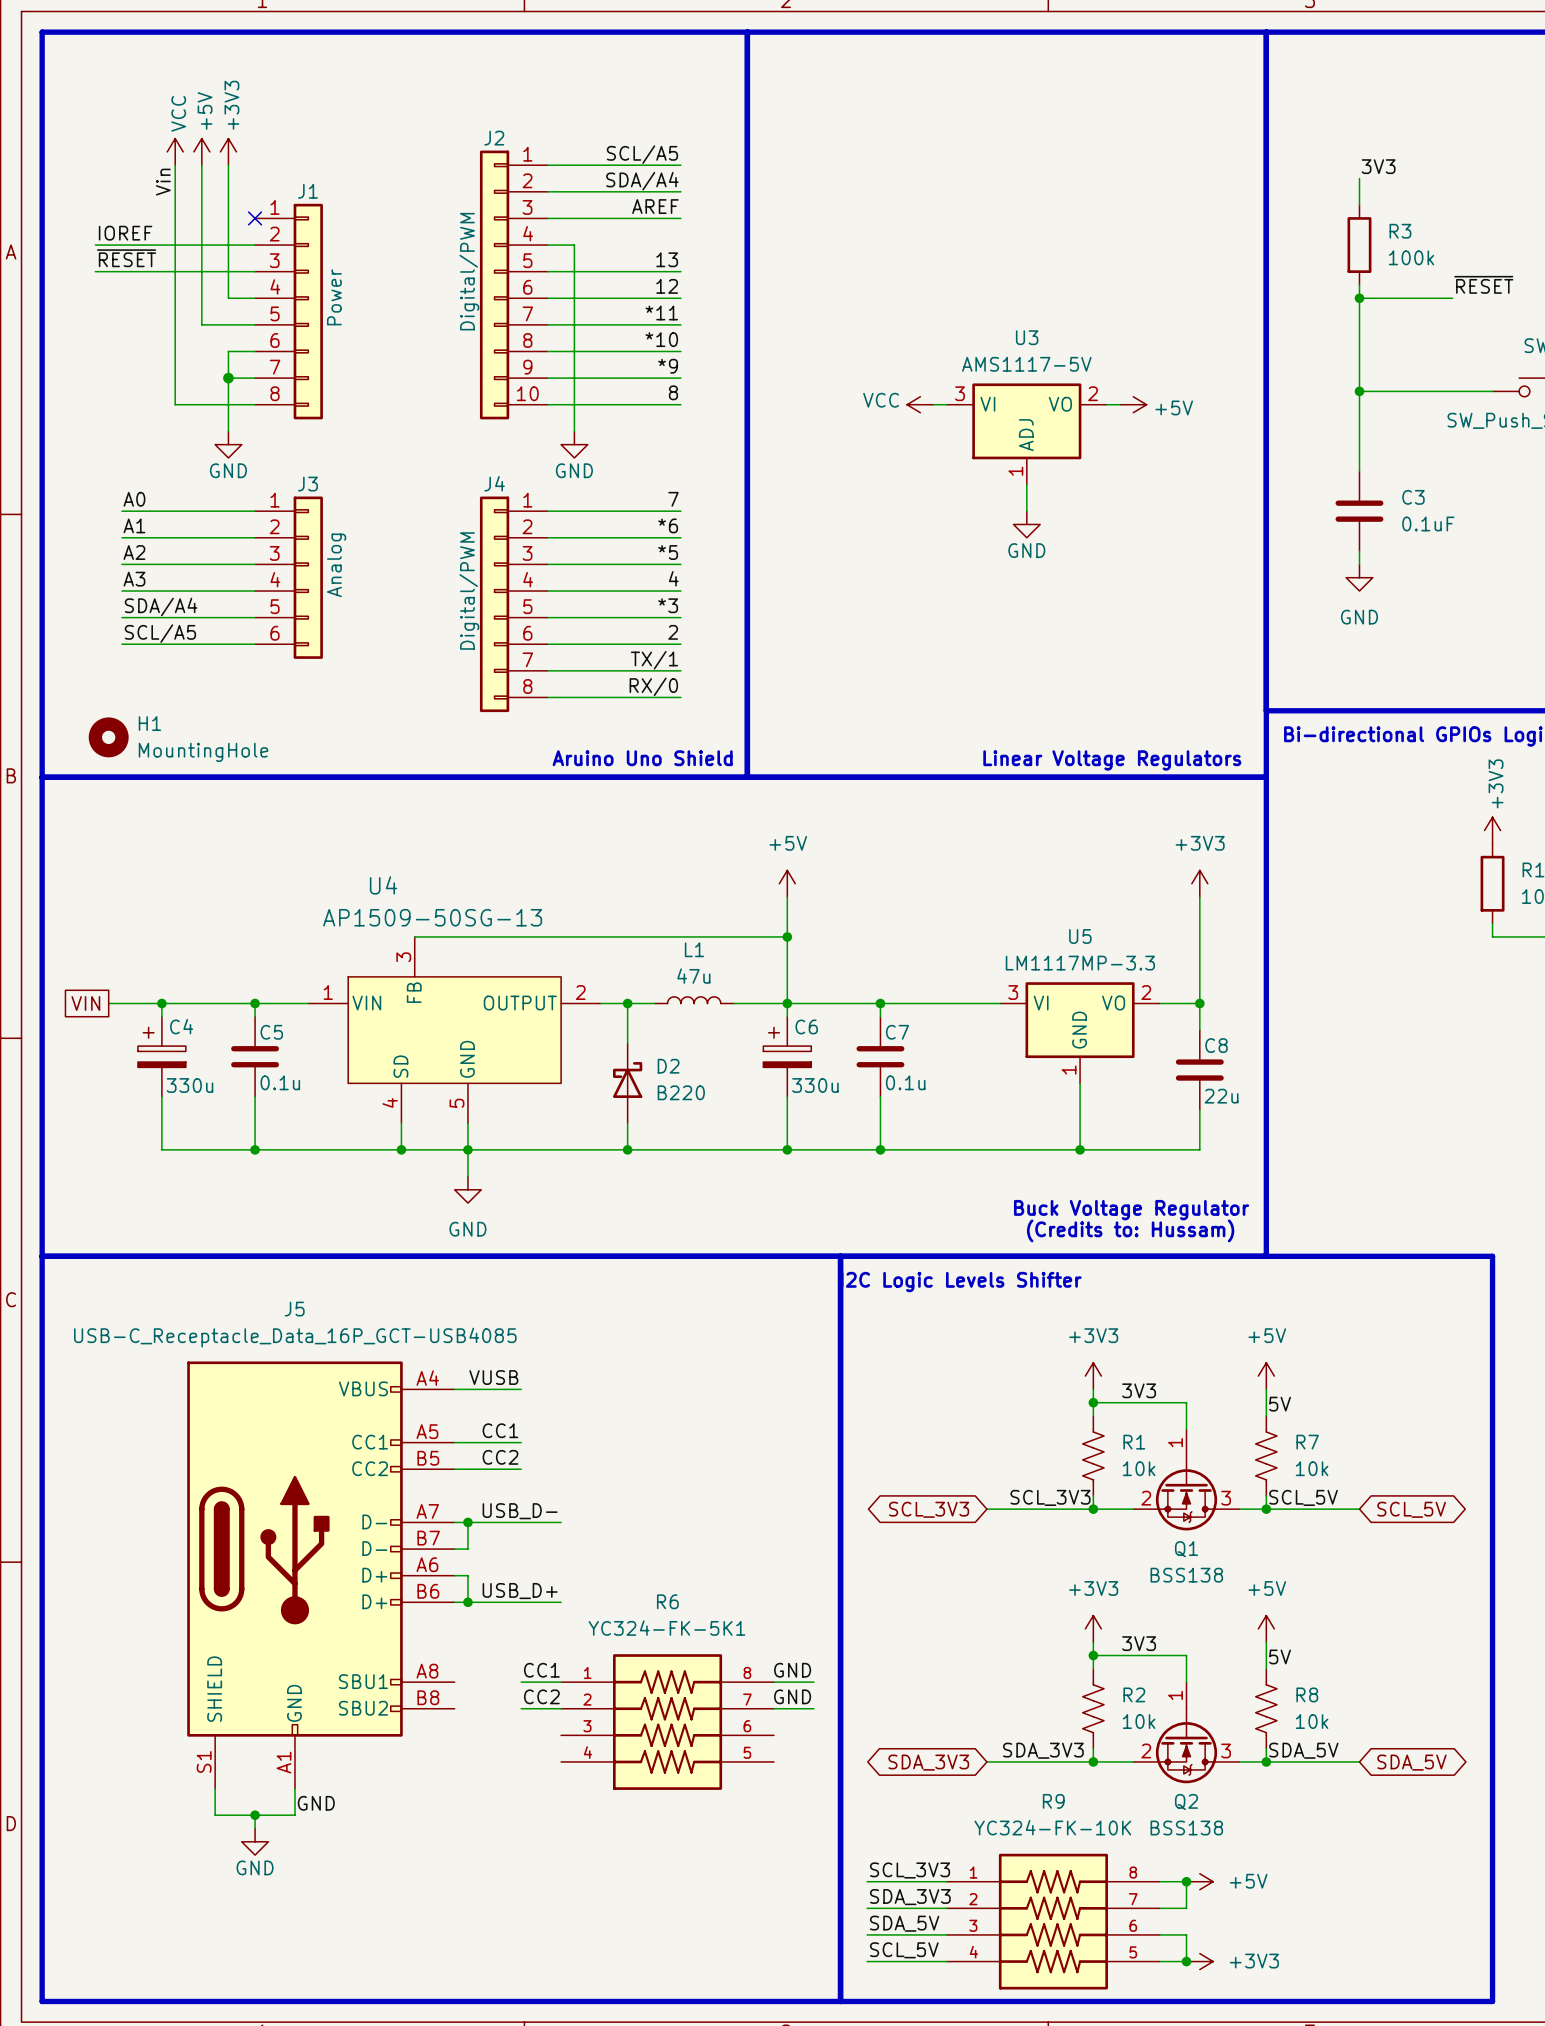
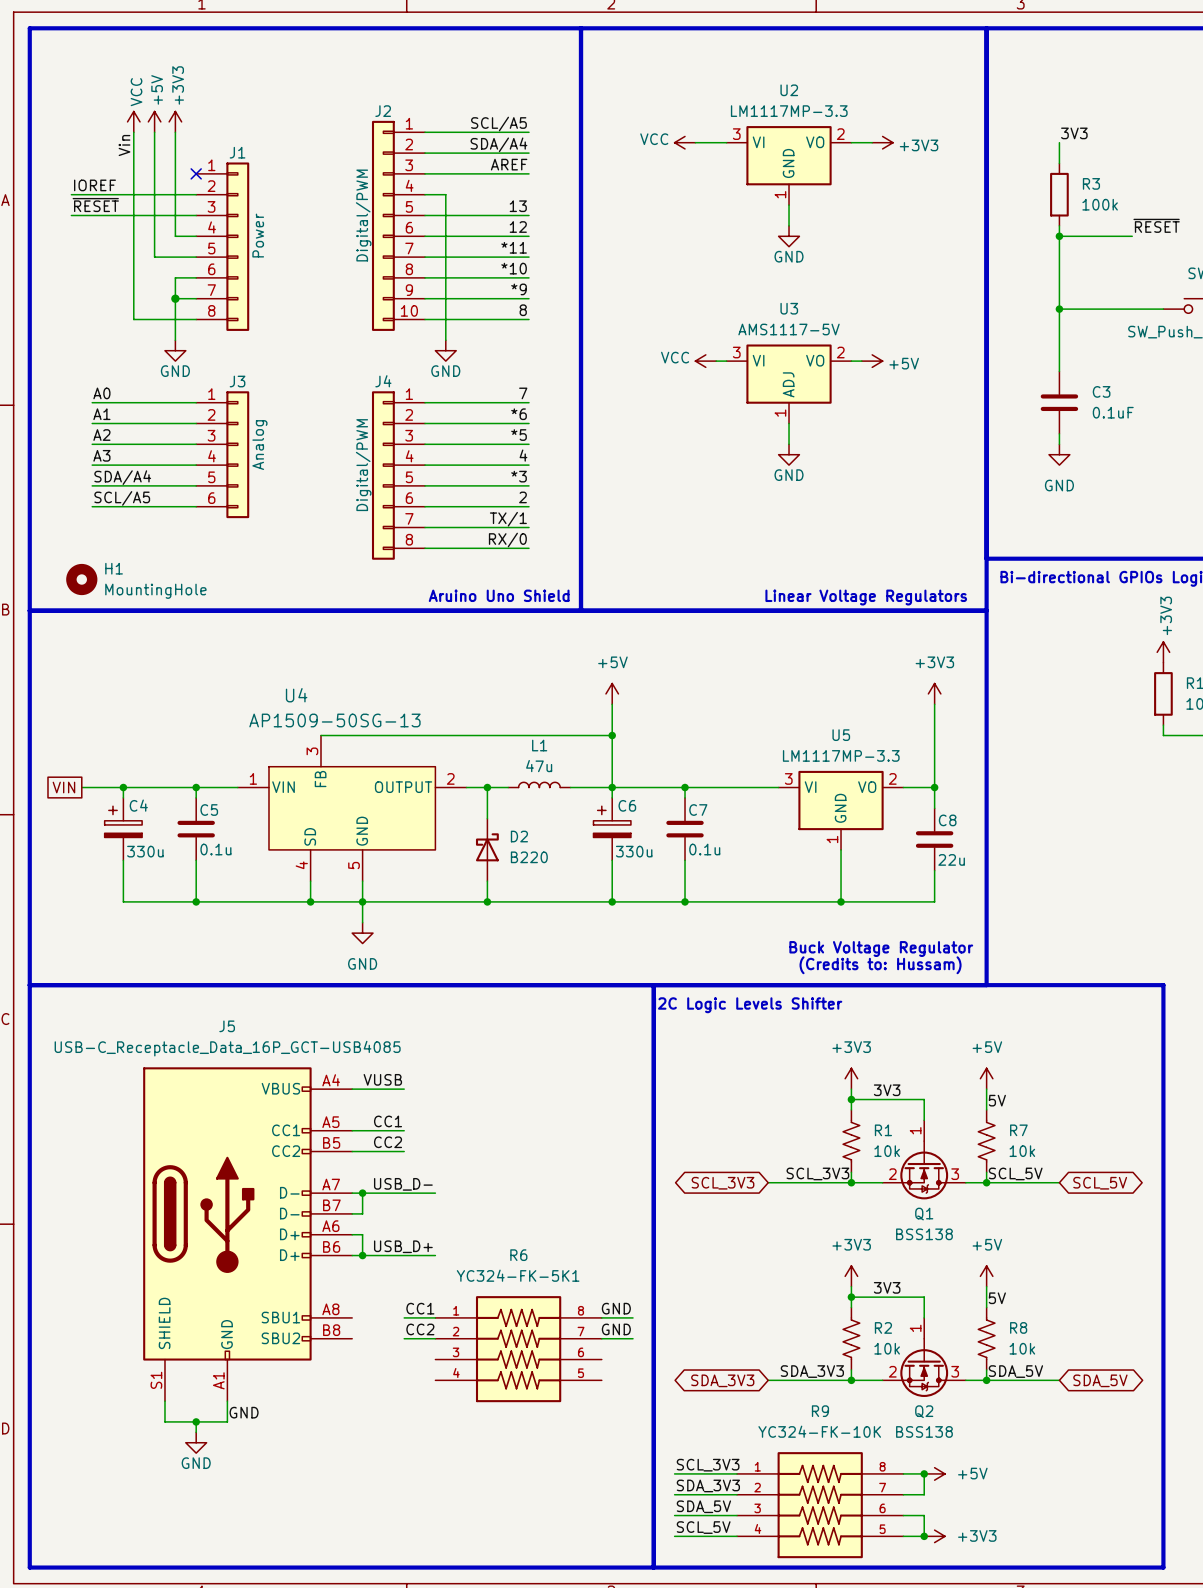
power symbol: none -> VCC (685, 142)
wire: none -> (695, 142) (726, 142)
wire: none -> (851, 142) (872, 142)
power symbol: none -> +3V3 (882, 142)
U2: none -> LM1117MP-3.3 (789, 165)
wire: none -> (789, 205) (789, 225)
power symbol: none -> GND (789, 236)
power symbol position: VCC (920, 404) -> VCC (705, 361)
wire: (933, 404) (946, 404) -> (716, 361) (726, 361)
wire: (1106, 404) (1119, 404) -> (851, 361) (861, 361)
power symbol position: +5V (1133, 404) -> +5V (872, 361)
U3 position: (1026, 433) -> (789, 383)
power symbol position: GND (1026, 524) -> GND (789, 454)

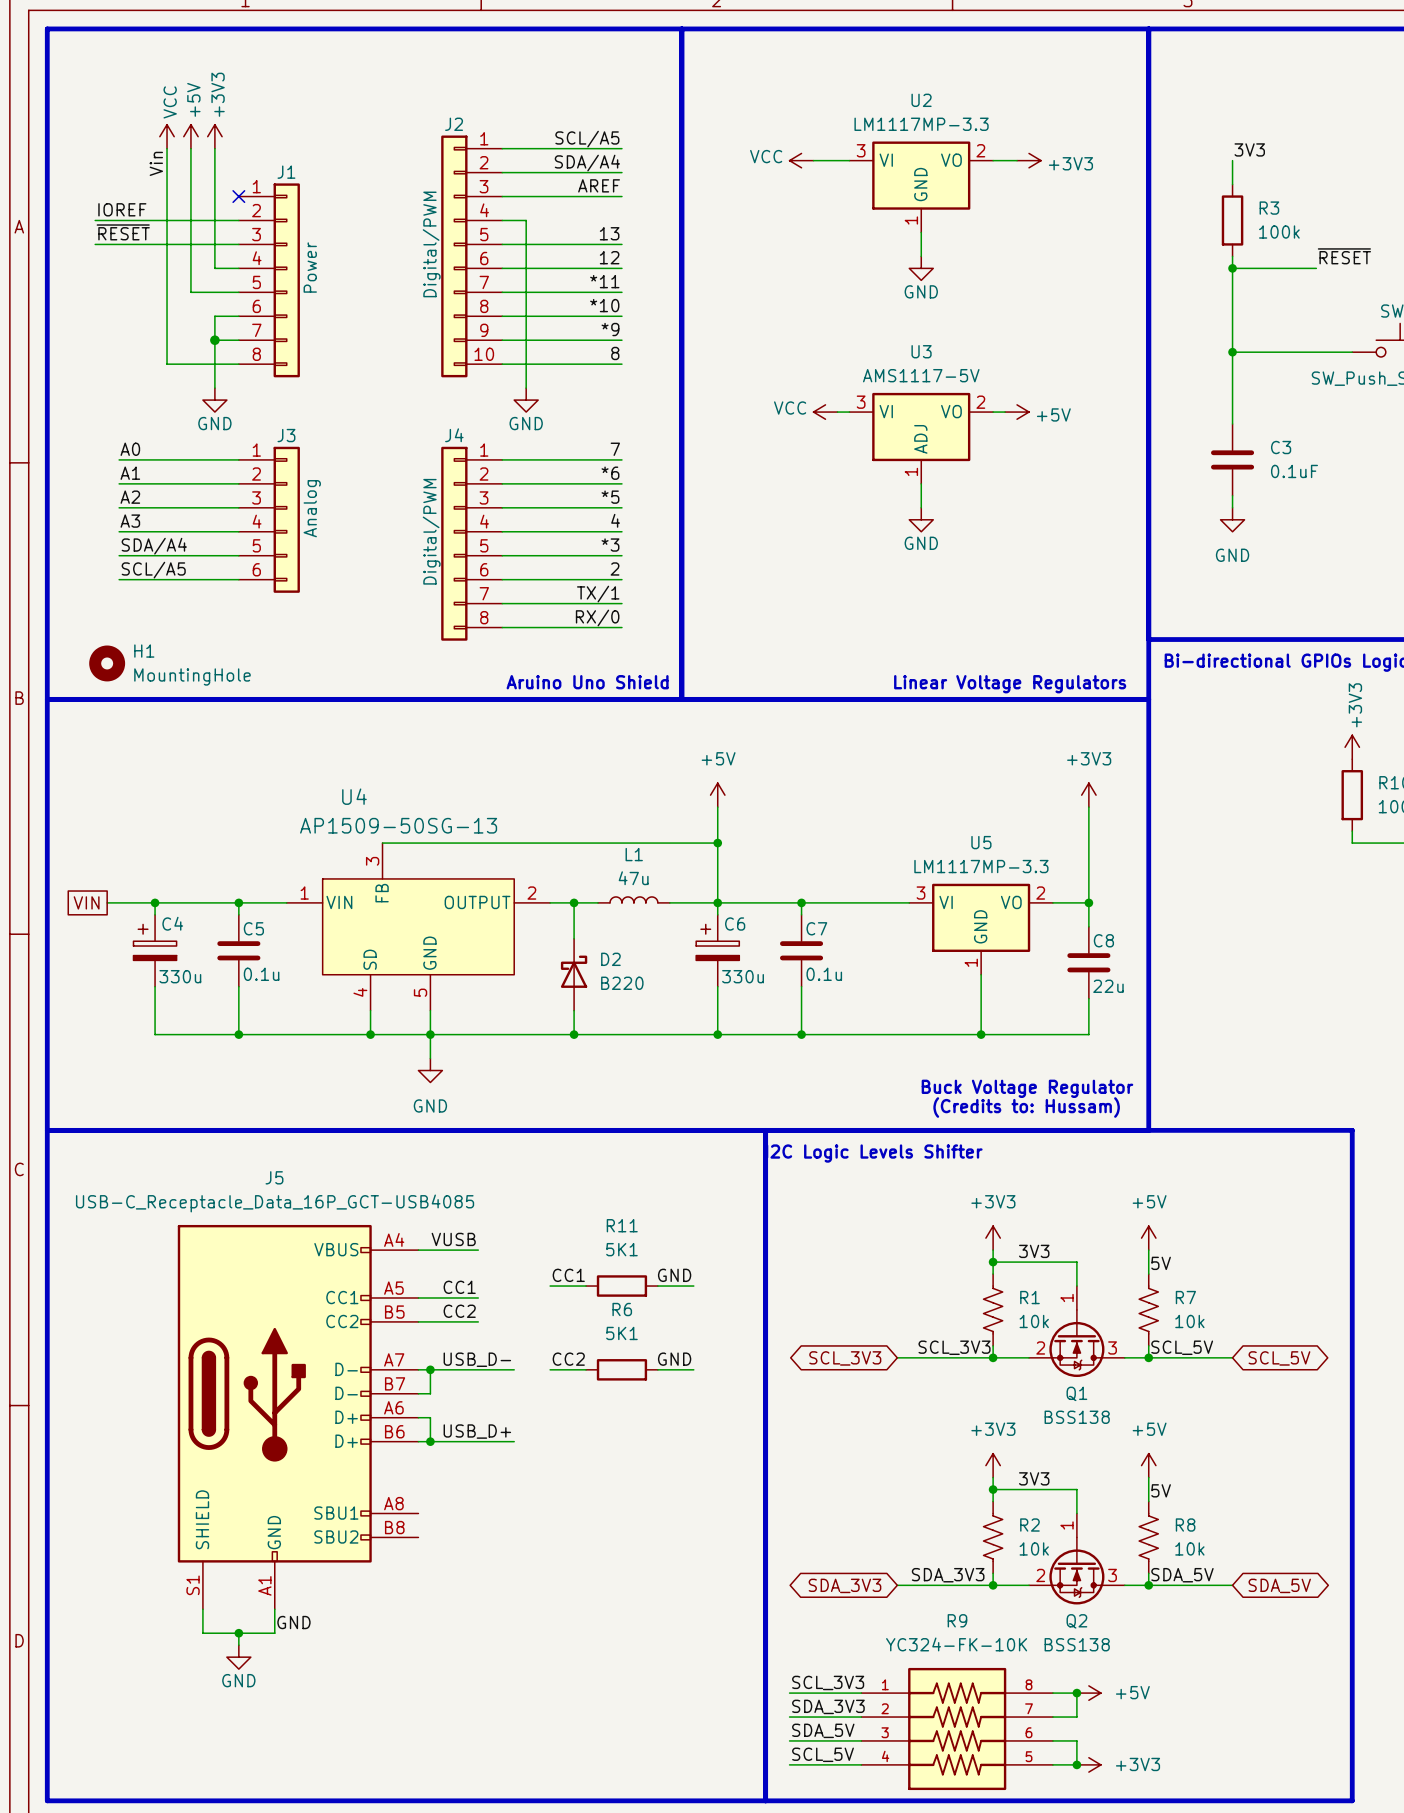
label: none -> CC1 (568, 1275)
label: none -> GND (674, 1275)
wire: none -> (550, 1286) (586, 1286)
R11: none -> 5K1 (621, 1286)
wire: none -> (657, 1286) (693, 1286)
label: none -> GND (674, 1359)
R6 name position: R6 (518, 1255) -> R6 (622, 1309)
R6 value: YC324-FK-5K1 (518, 1275) -> 5K1 (621, 1333)
R6 symbol: [435, 1296, 602, 1403] -> [586, 1359, 658, 1381]
label: CC1 (420, 1308) -> none
label: GND (616, 1308) -> none
wire: (404, 1317) (435, 1317) -> (550, 1369) (586, 1369)
wire: (601, 1317) (633, 1317) -> (657, 1369) (693, 1369)
label position: CC2 (420, 1329) -> CC2 (568, 1359)
label: GND (616, 1329) -> none
wire: (404, 1338) (435, 1338) -> none
wire: (601, 1338) (633, 1338) -> none

